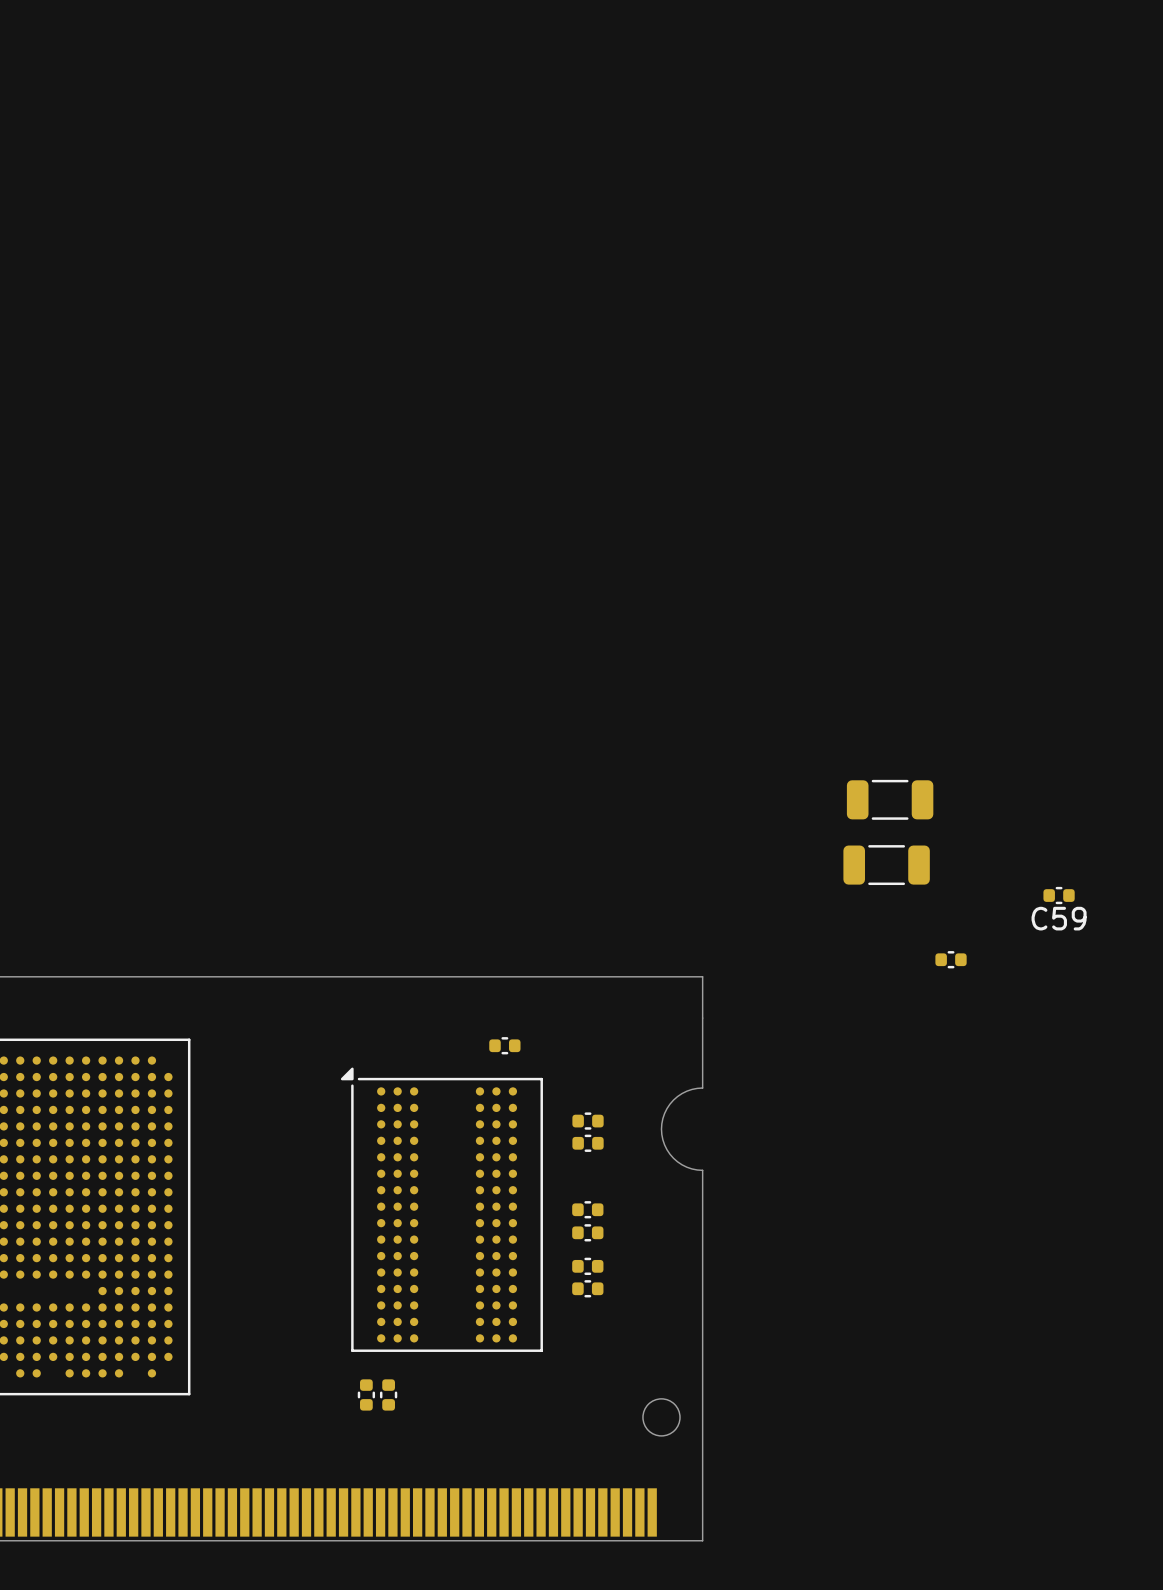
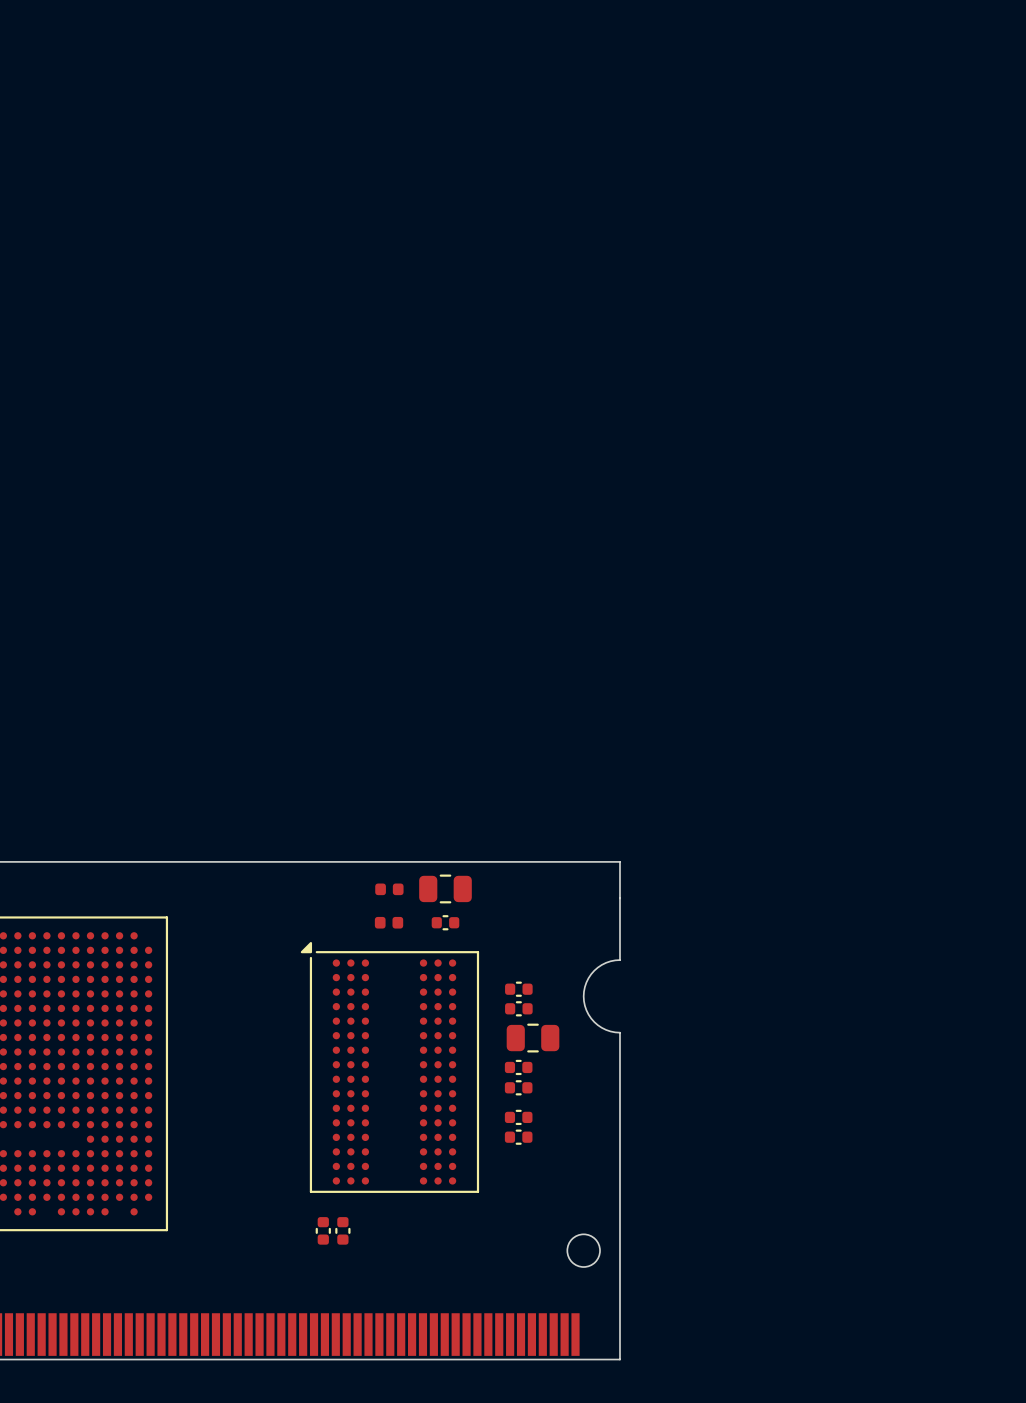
part: (890, 799) -> none
part: (886, 865) -> none
C59: (1059, 895) -> none
part: (951, 959) -> none
part: none -> (389, 889)
part: none -> (445, 888)
part: none -> (389, 922)
part: none -> (533, 1038)

